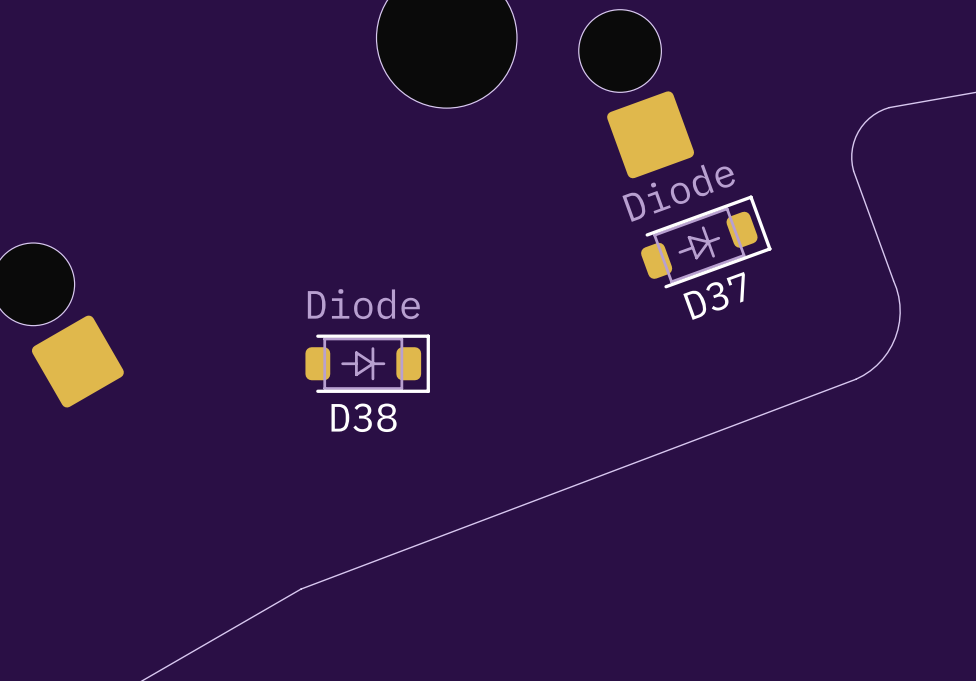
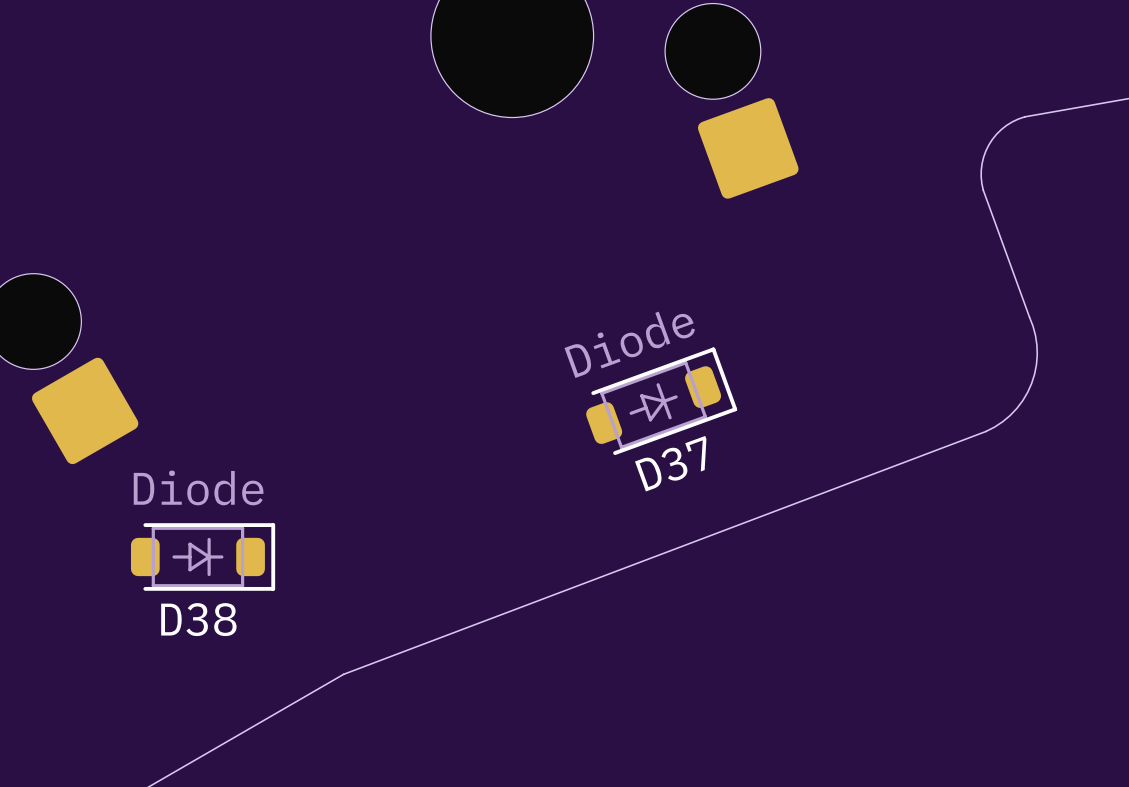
D37 position: (706, 241) -> (661, 401)
D38 position: (367, 363) -> (203, 556)

